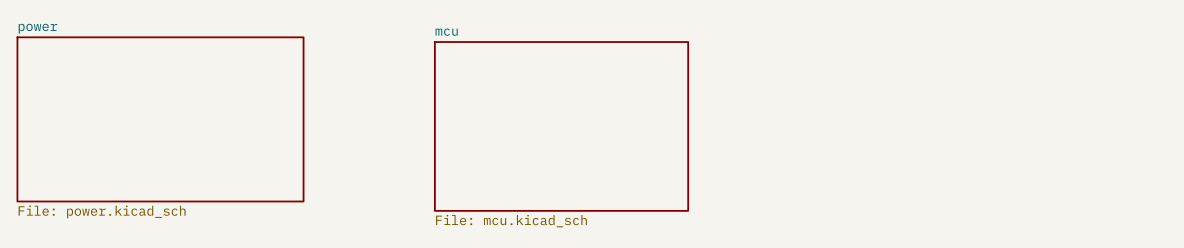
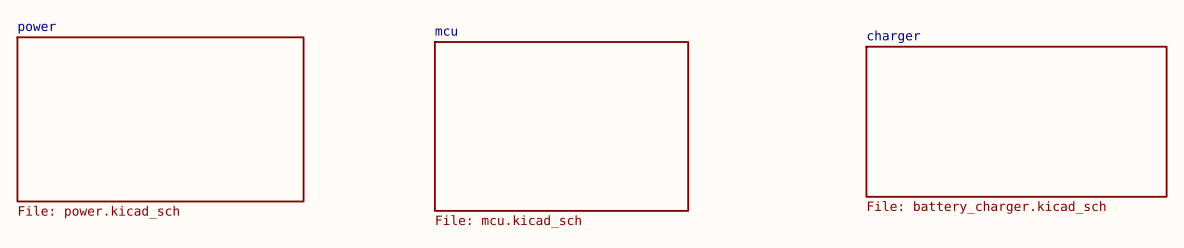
sheet charger: none -> File: battery_charger.kicad_sch (1016, 121)

